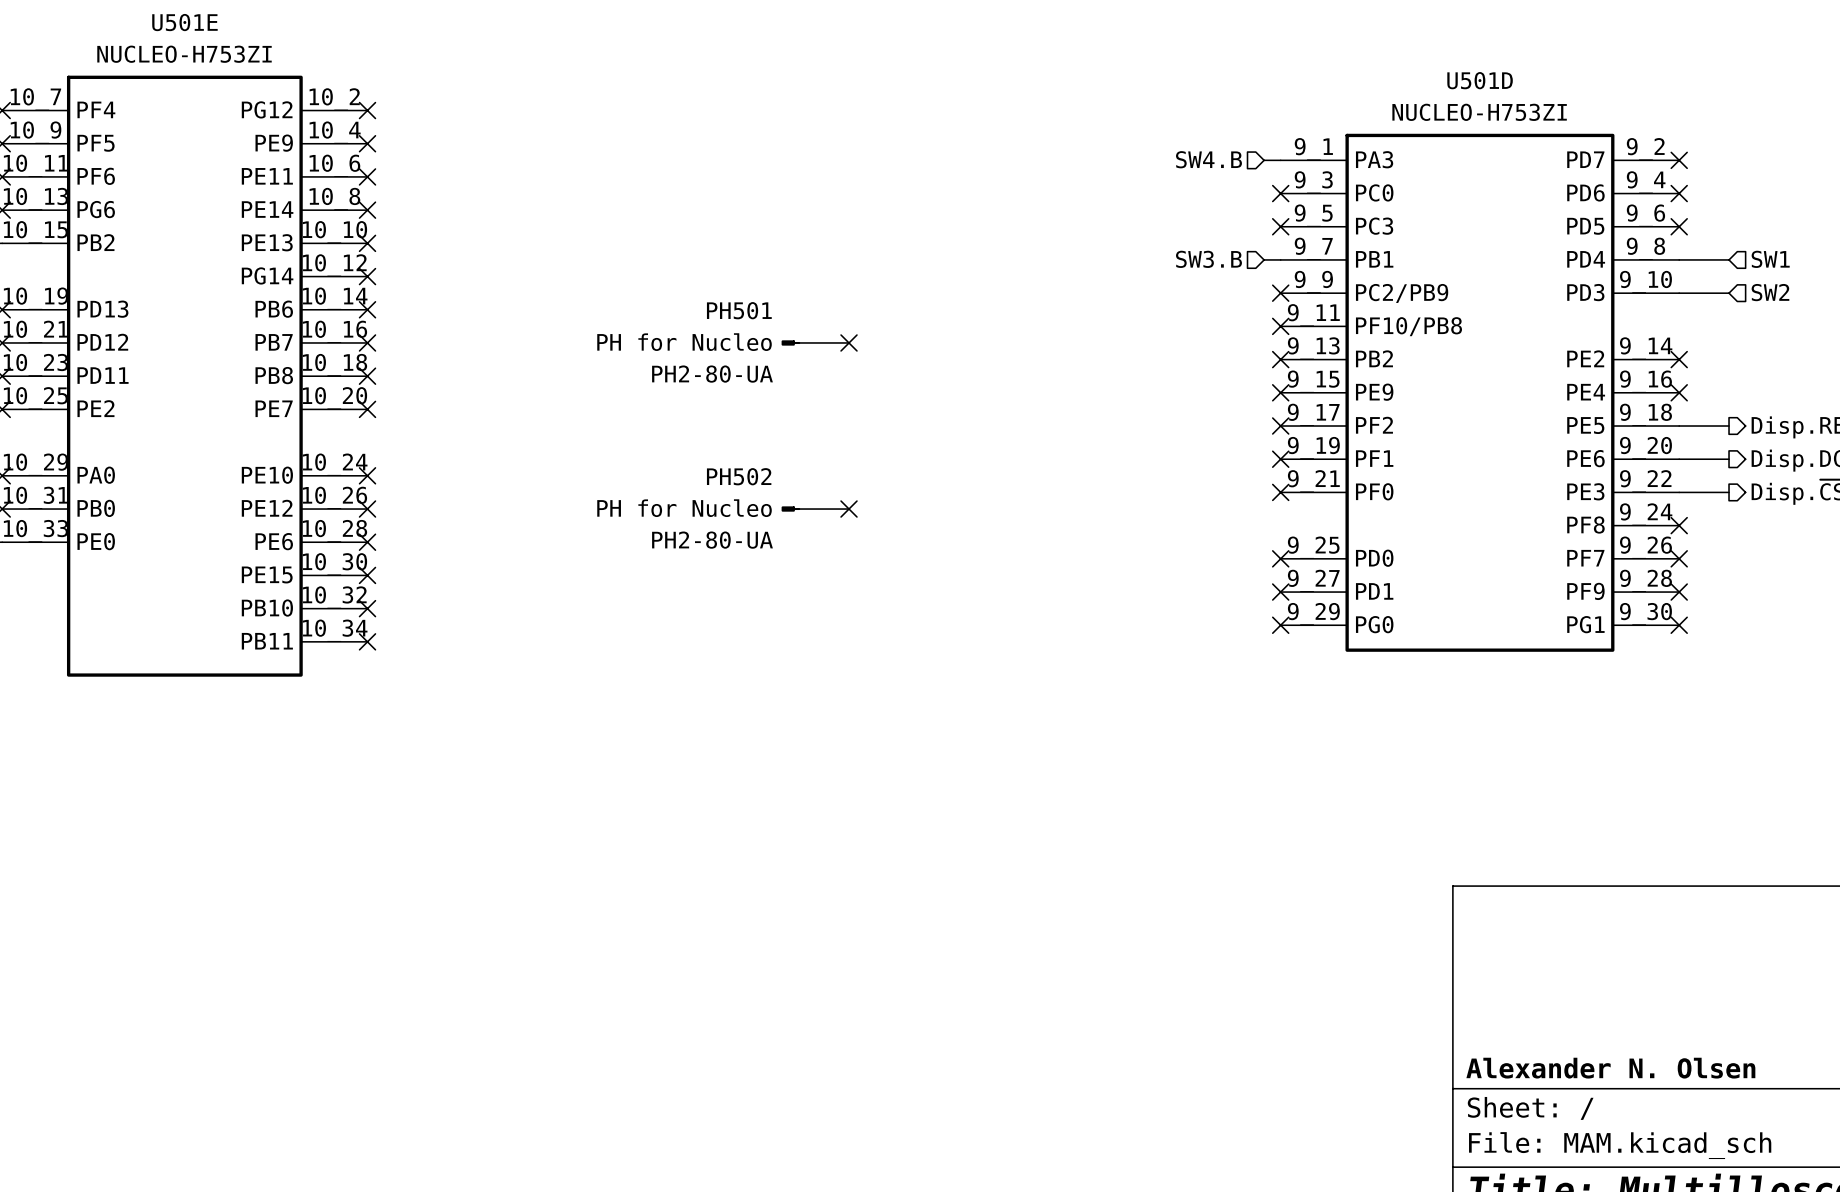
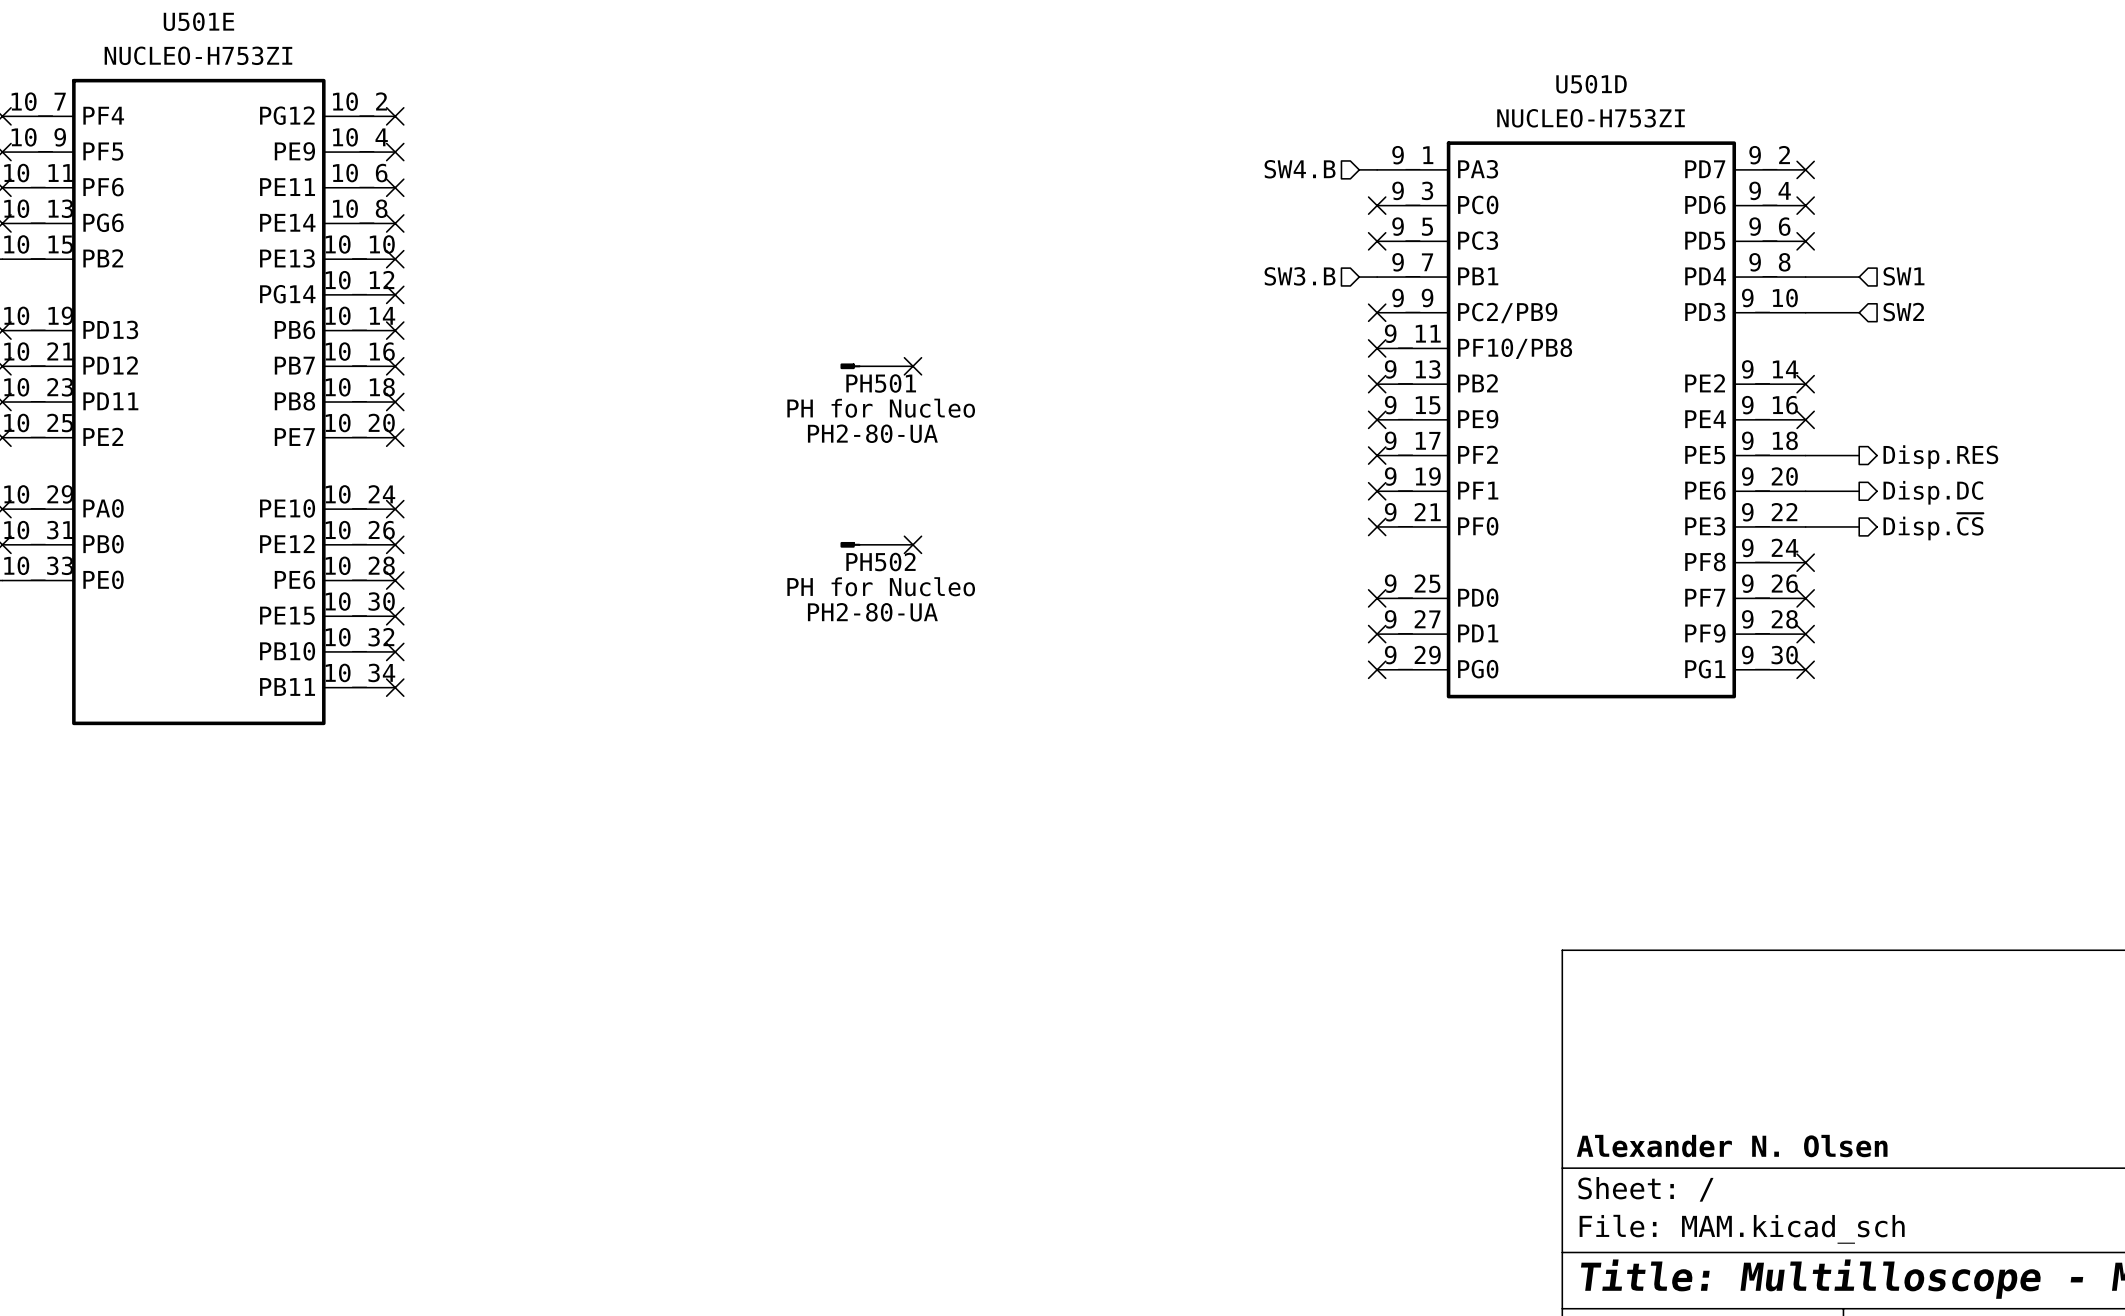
PH501 name position: PH501 (739, 310) -> PH501 (881, 383)
PH501 value position: PH for Nucleo (684, 342) -> PH for Nucleo (881, 408)
PH501 text position: PH2-80-UA (712, 374) -> PH2-80-UA (872, 433)
PH502 name position: PH502 (739, 476) -> PH502 (880, 562)
PH502 value position: PH for Nucleo (684, 508) -> PH for Nucleo (881, 586)
PH502 text position: PH2-80-UA (712, 540) -> PH2-80-UA (872, 612)

